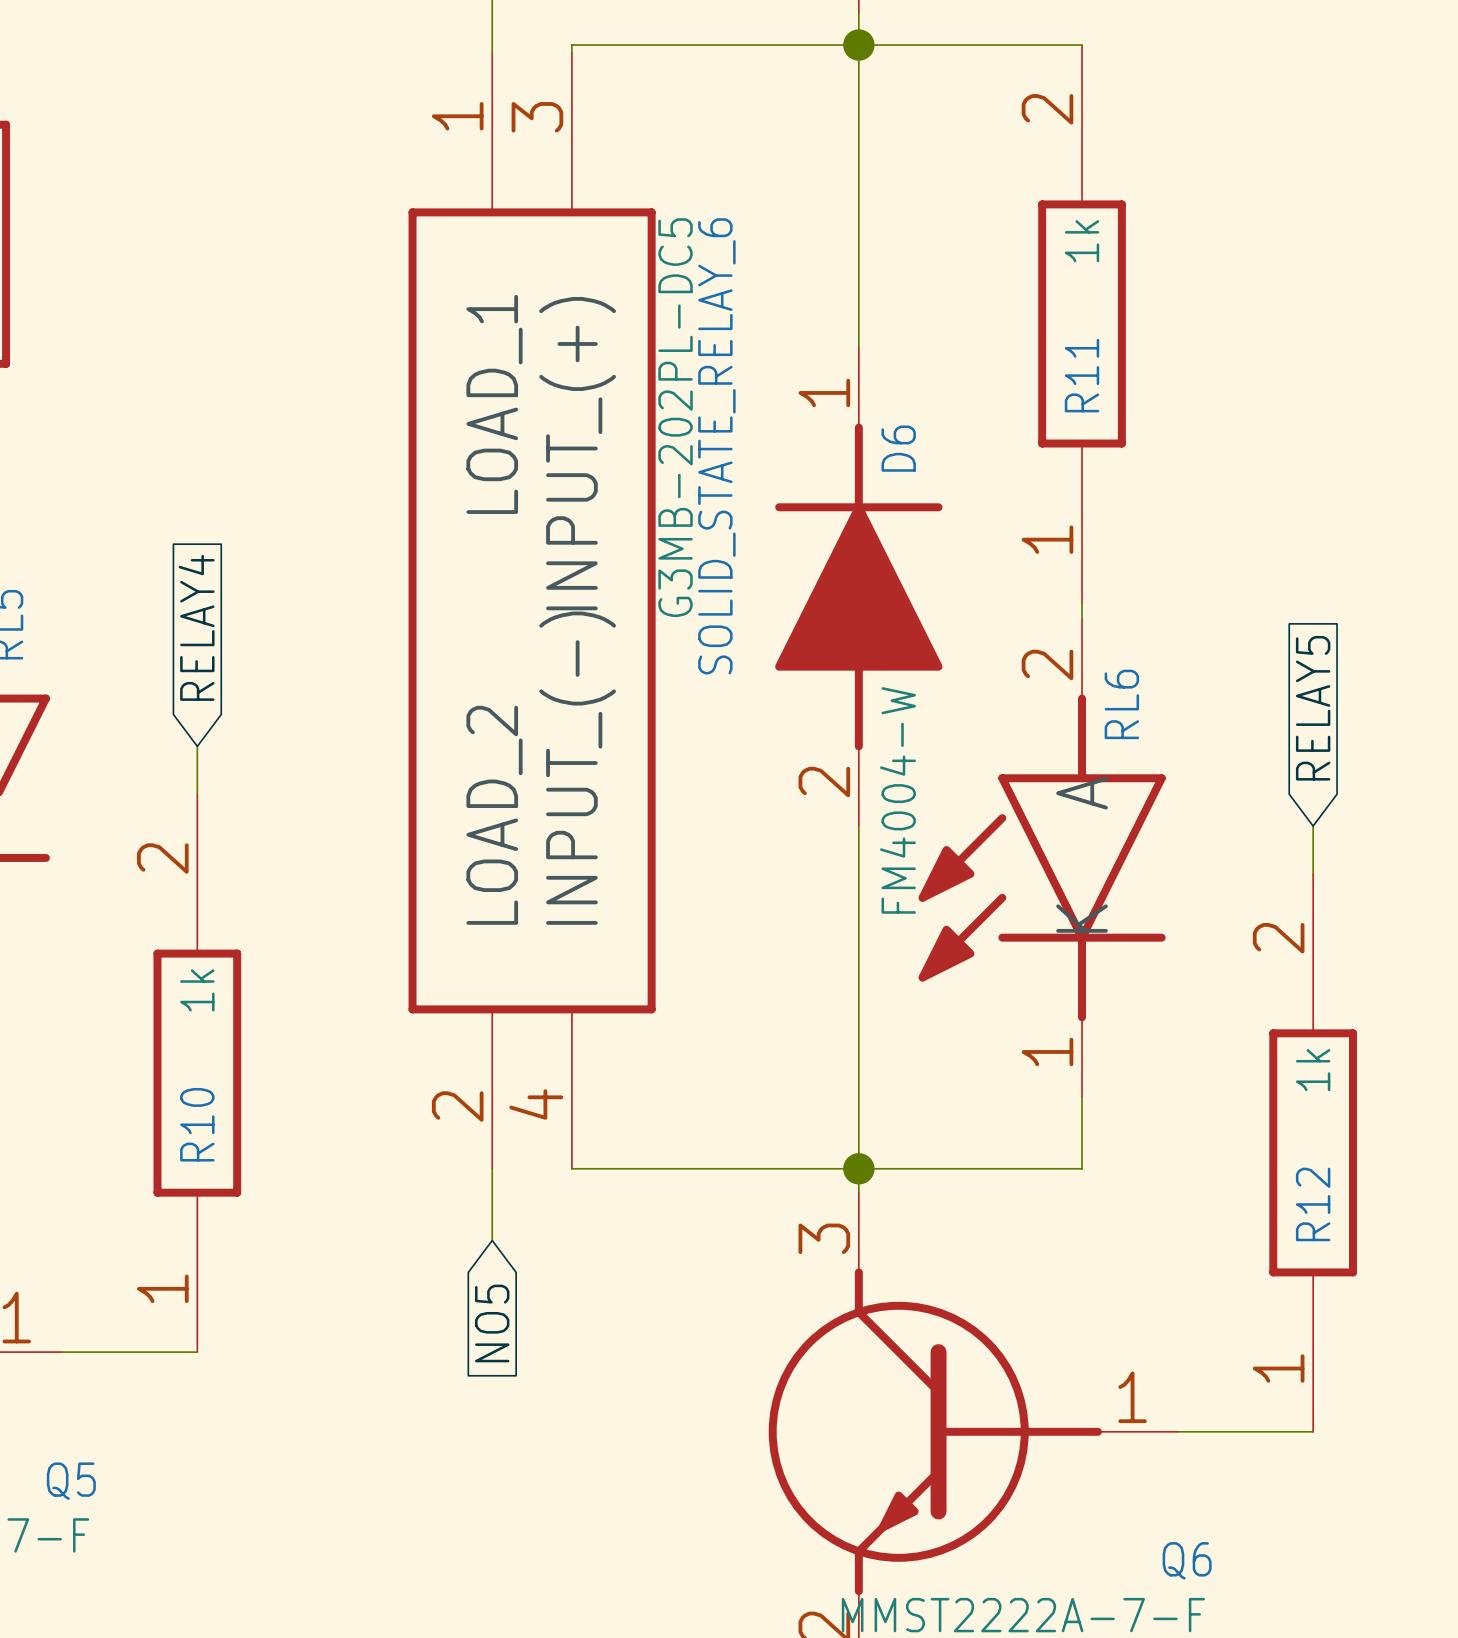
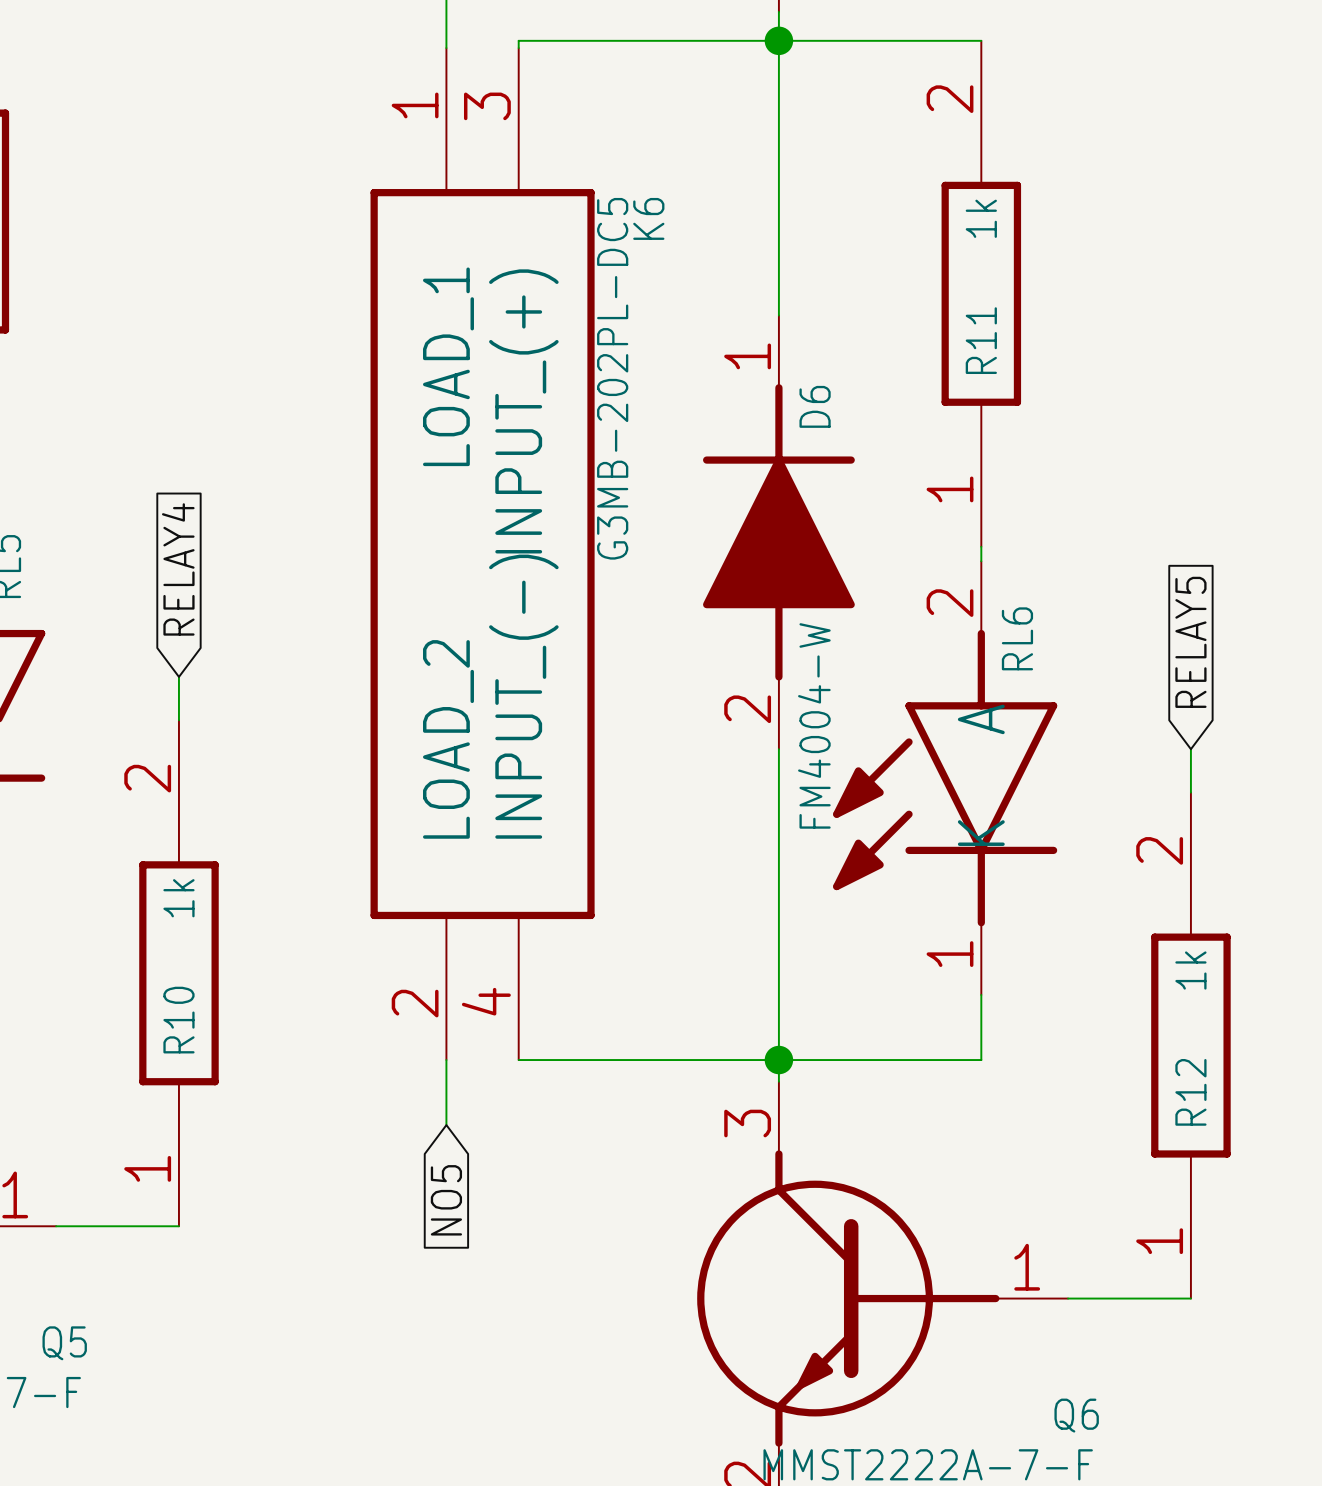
SOLID_STATE_RELAY_6 name: SOLID_STATE_RELAY_6 (716, 446) -> K6 (648, 218)

